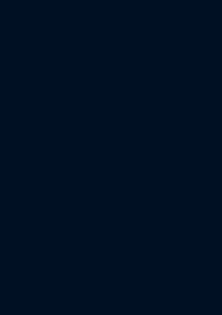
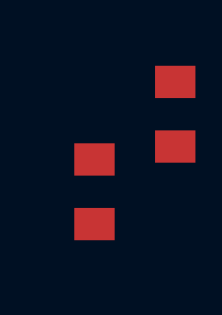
part: none -> (175, 114)
part: none -> (94, 191)

